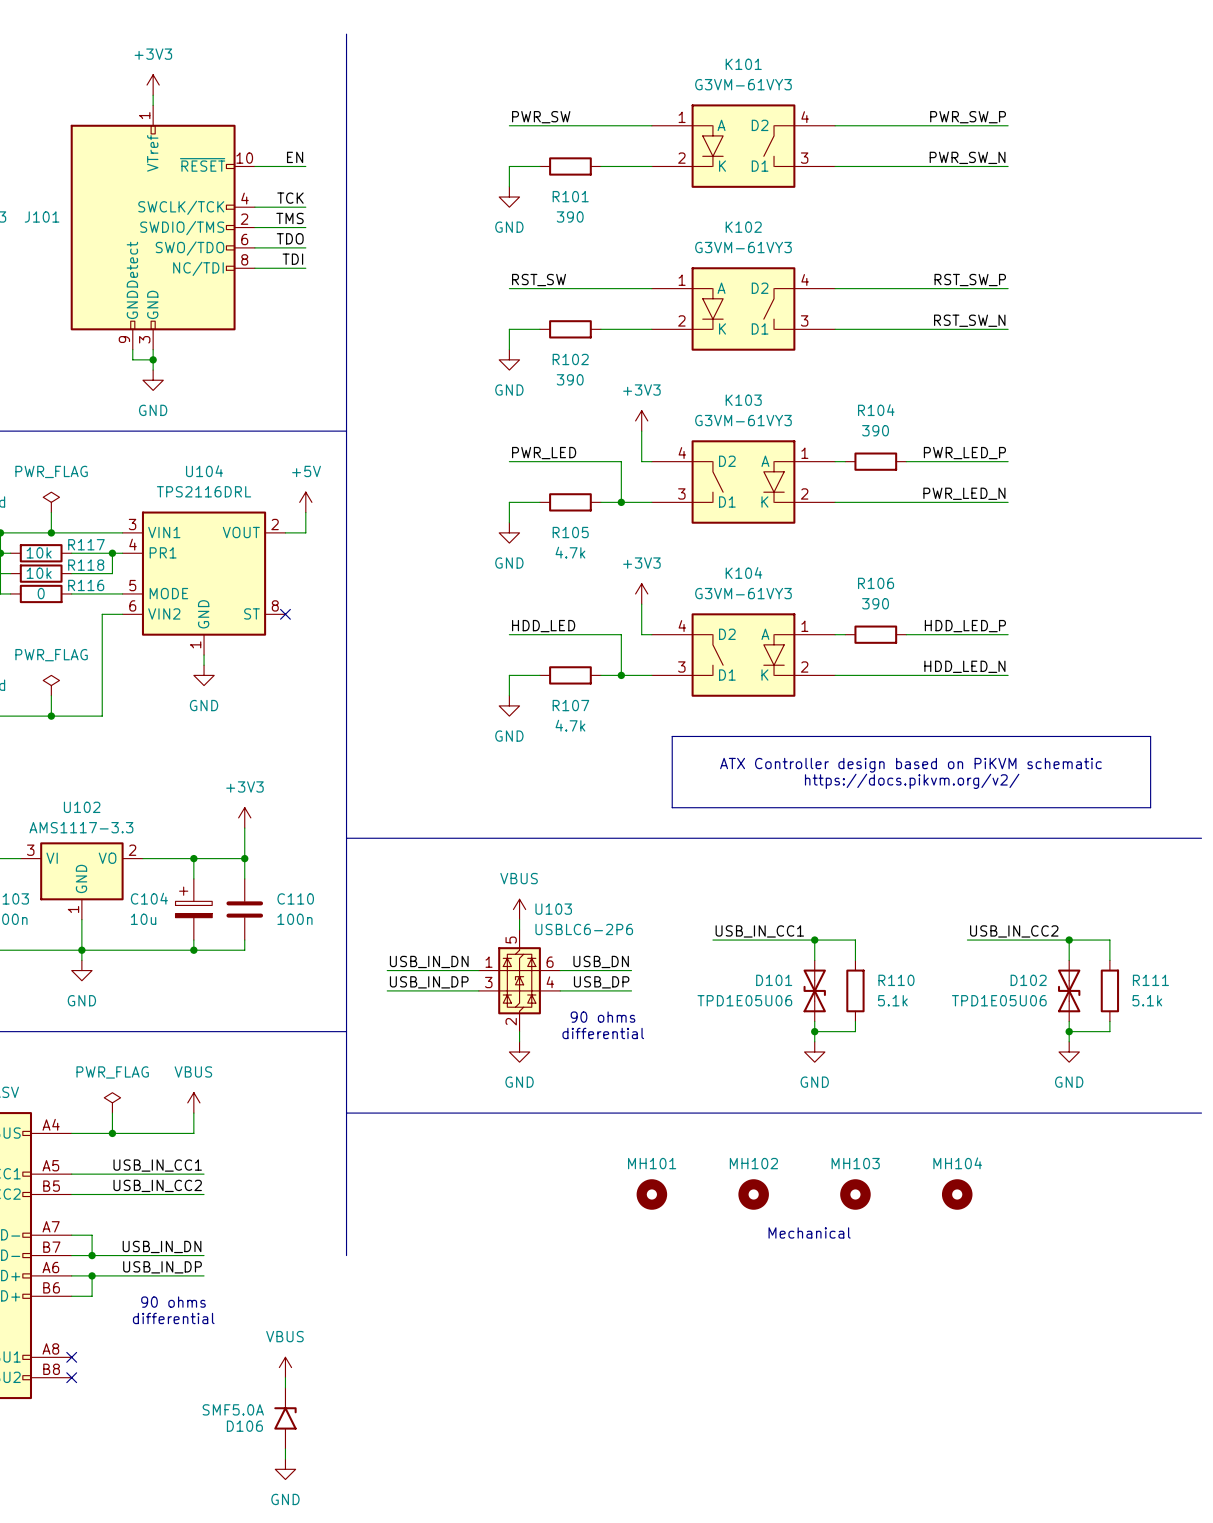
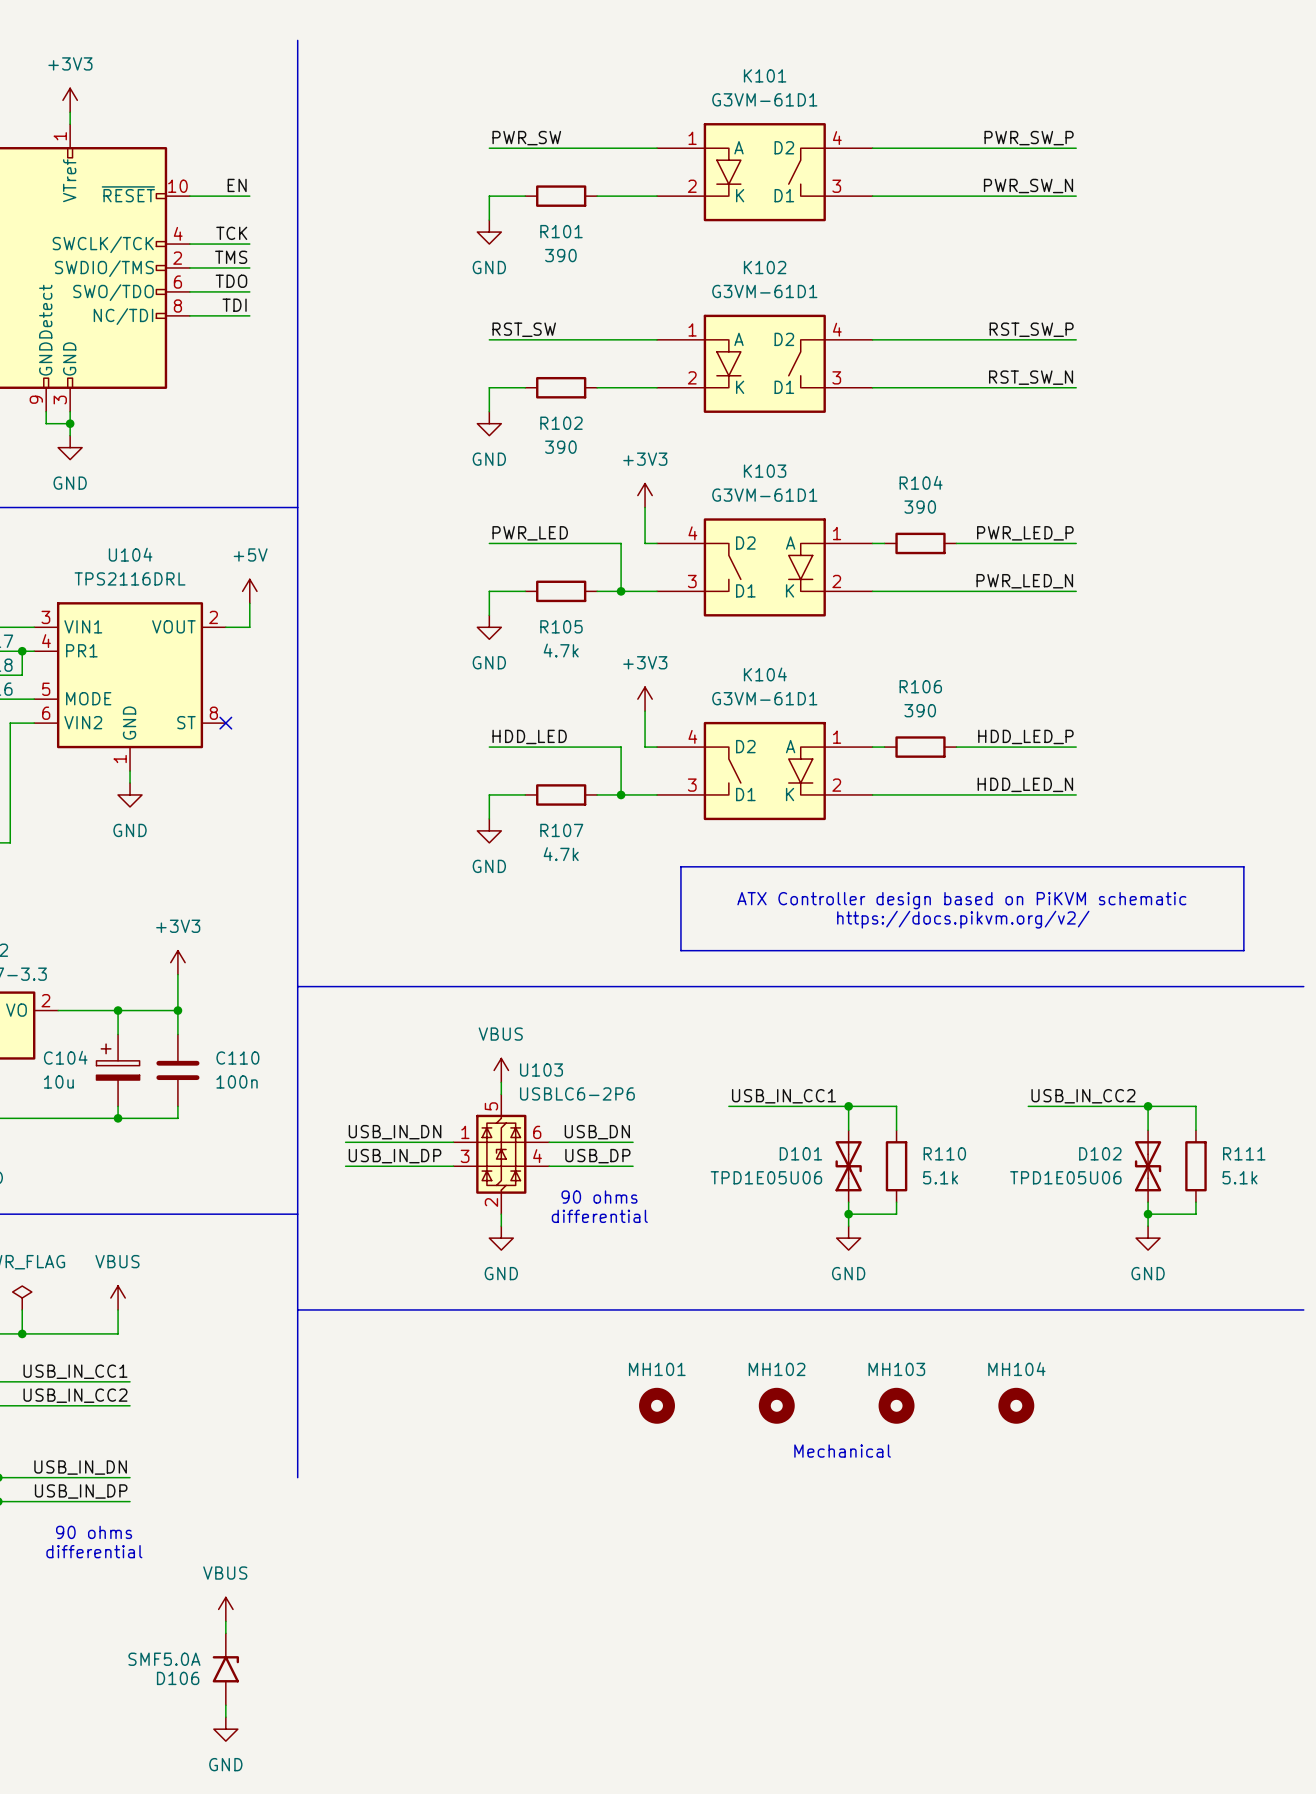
K101 value: G3VM-61VY3 (743, 84) -> G3VM-61D1 (764, 99)
K102 value: G3VM-61VY3 (743, 247) -> G3VM-61D1 (764, 291)
K103 value: G3VM-61VY3 (743, 420) -> G3VM-61D1 (764, 495)
K104 value: G3VM-61VY3 (743, 593) -> G3VM-61D1 (764, 698)

